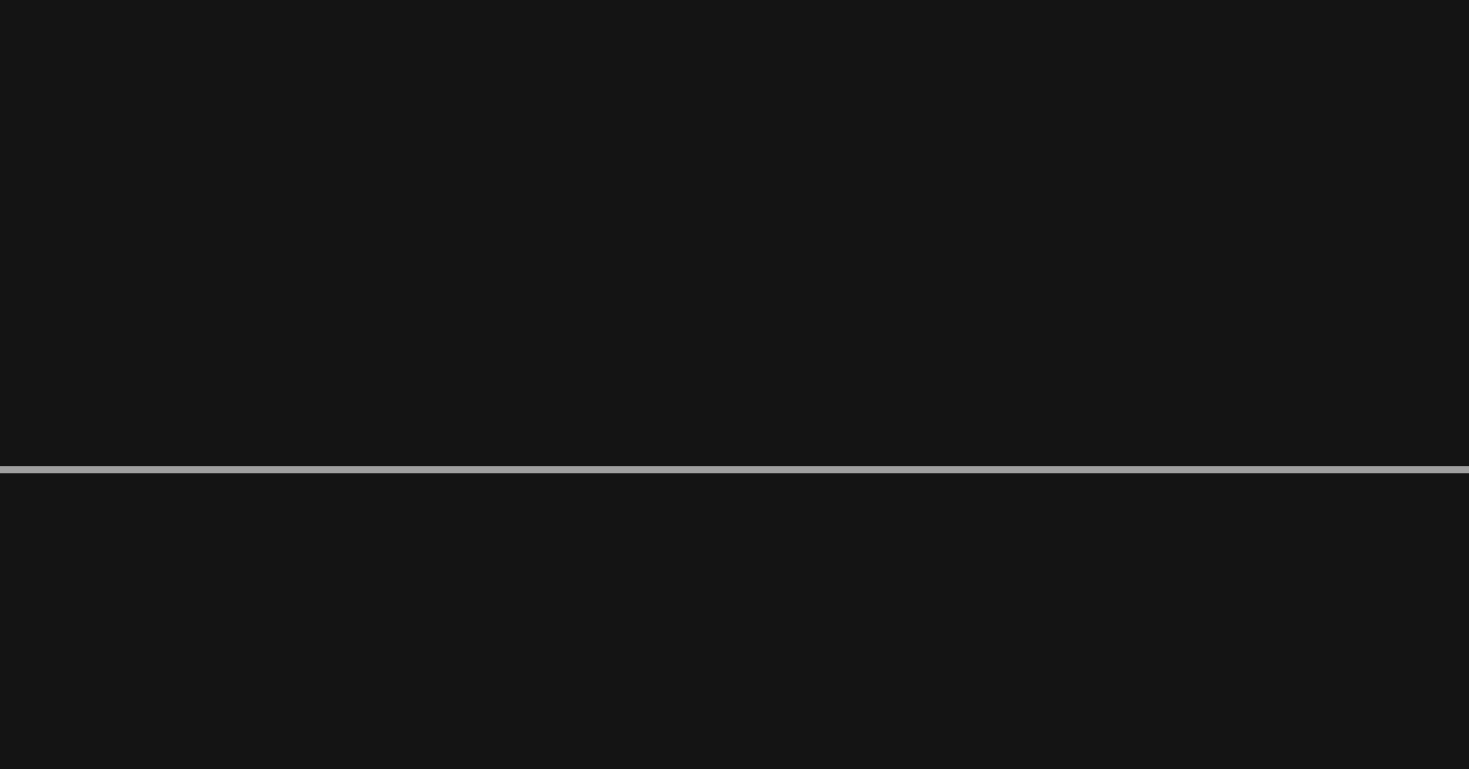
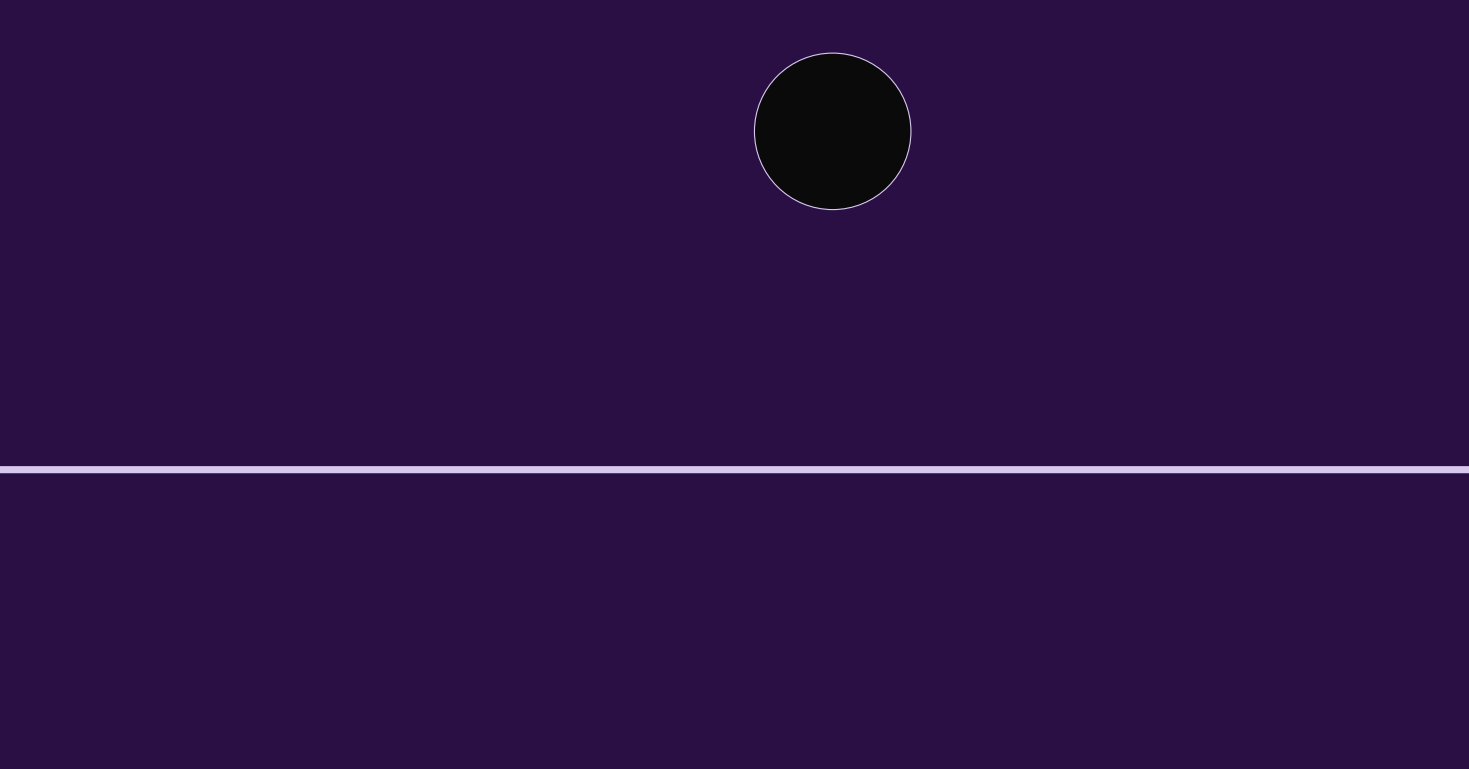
part: none -> (832, 131)

